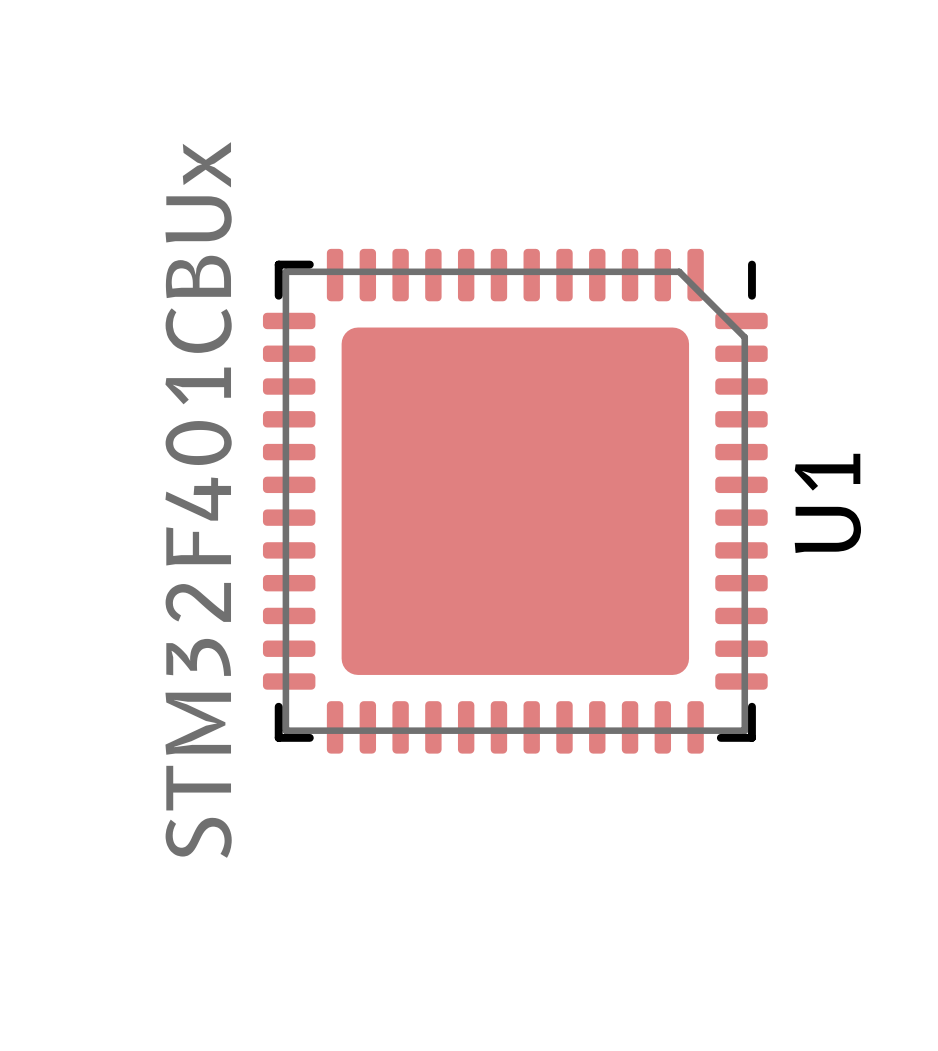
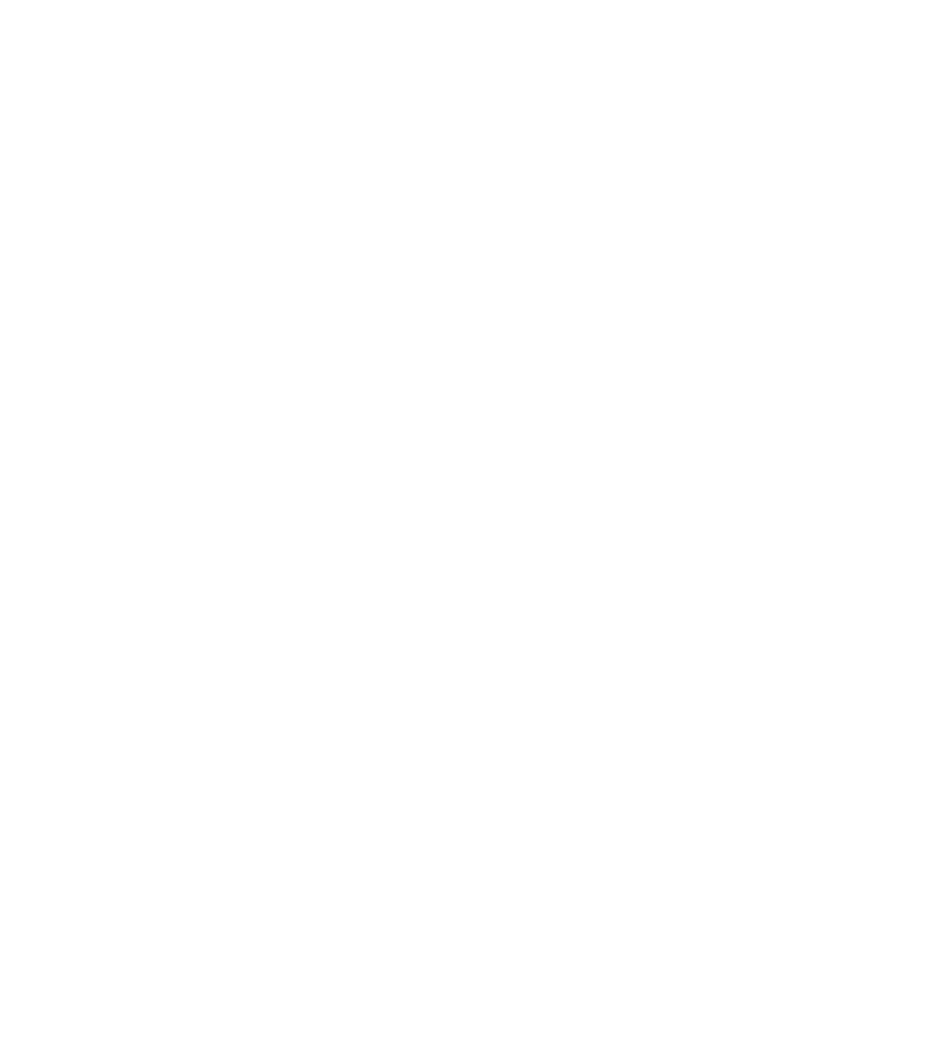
U1: STM32F401CBUx (515, 501) -> none

